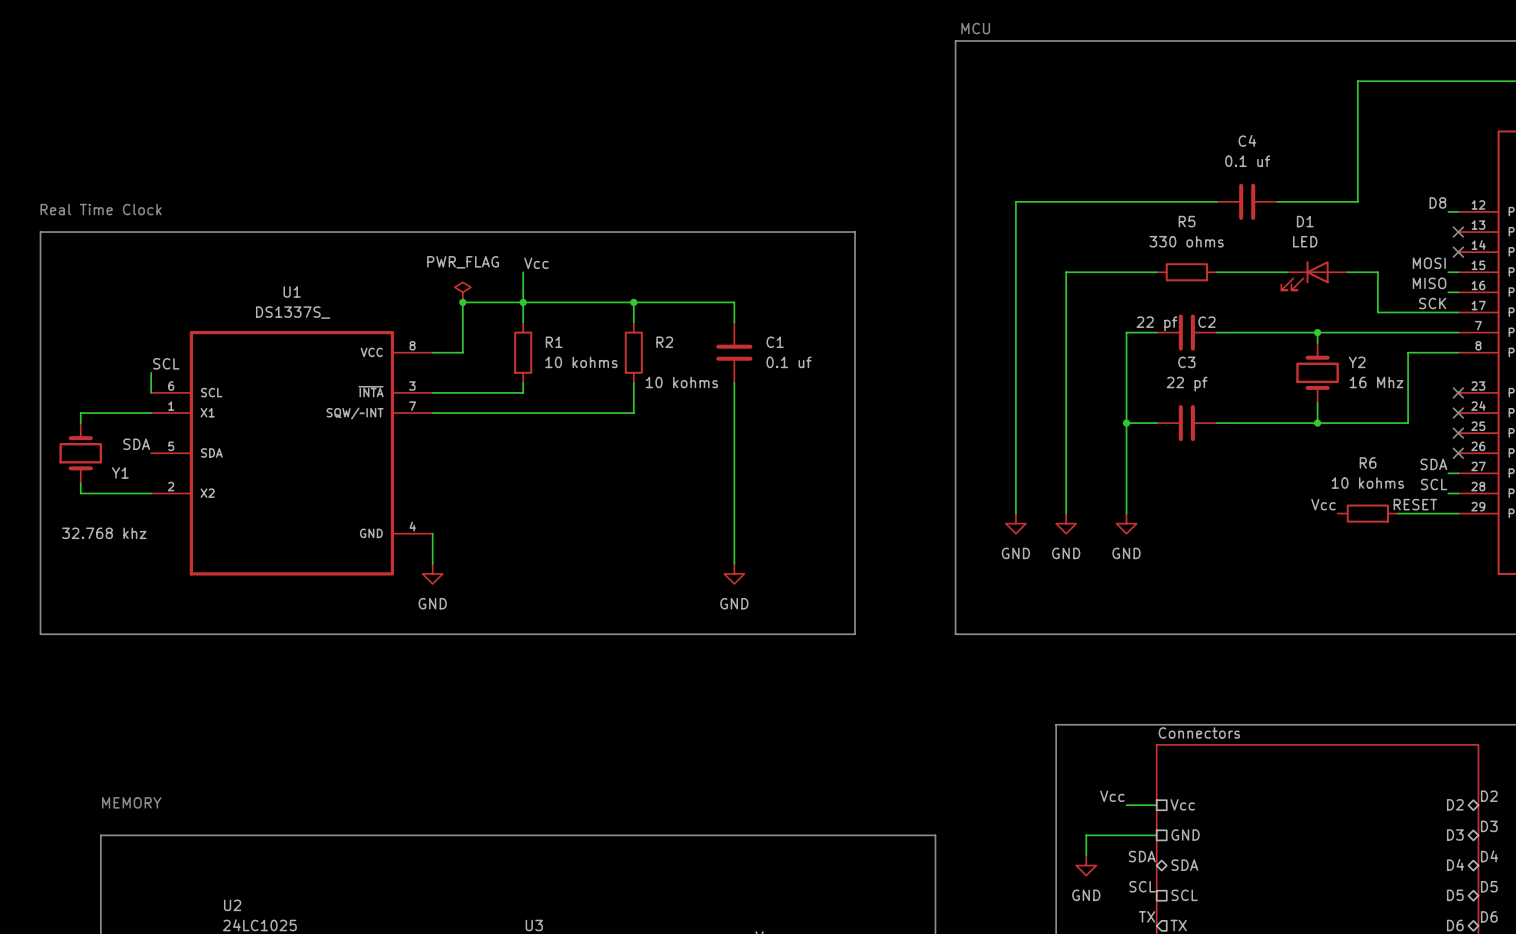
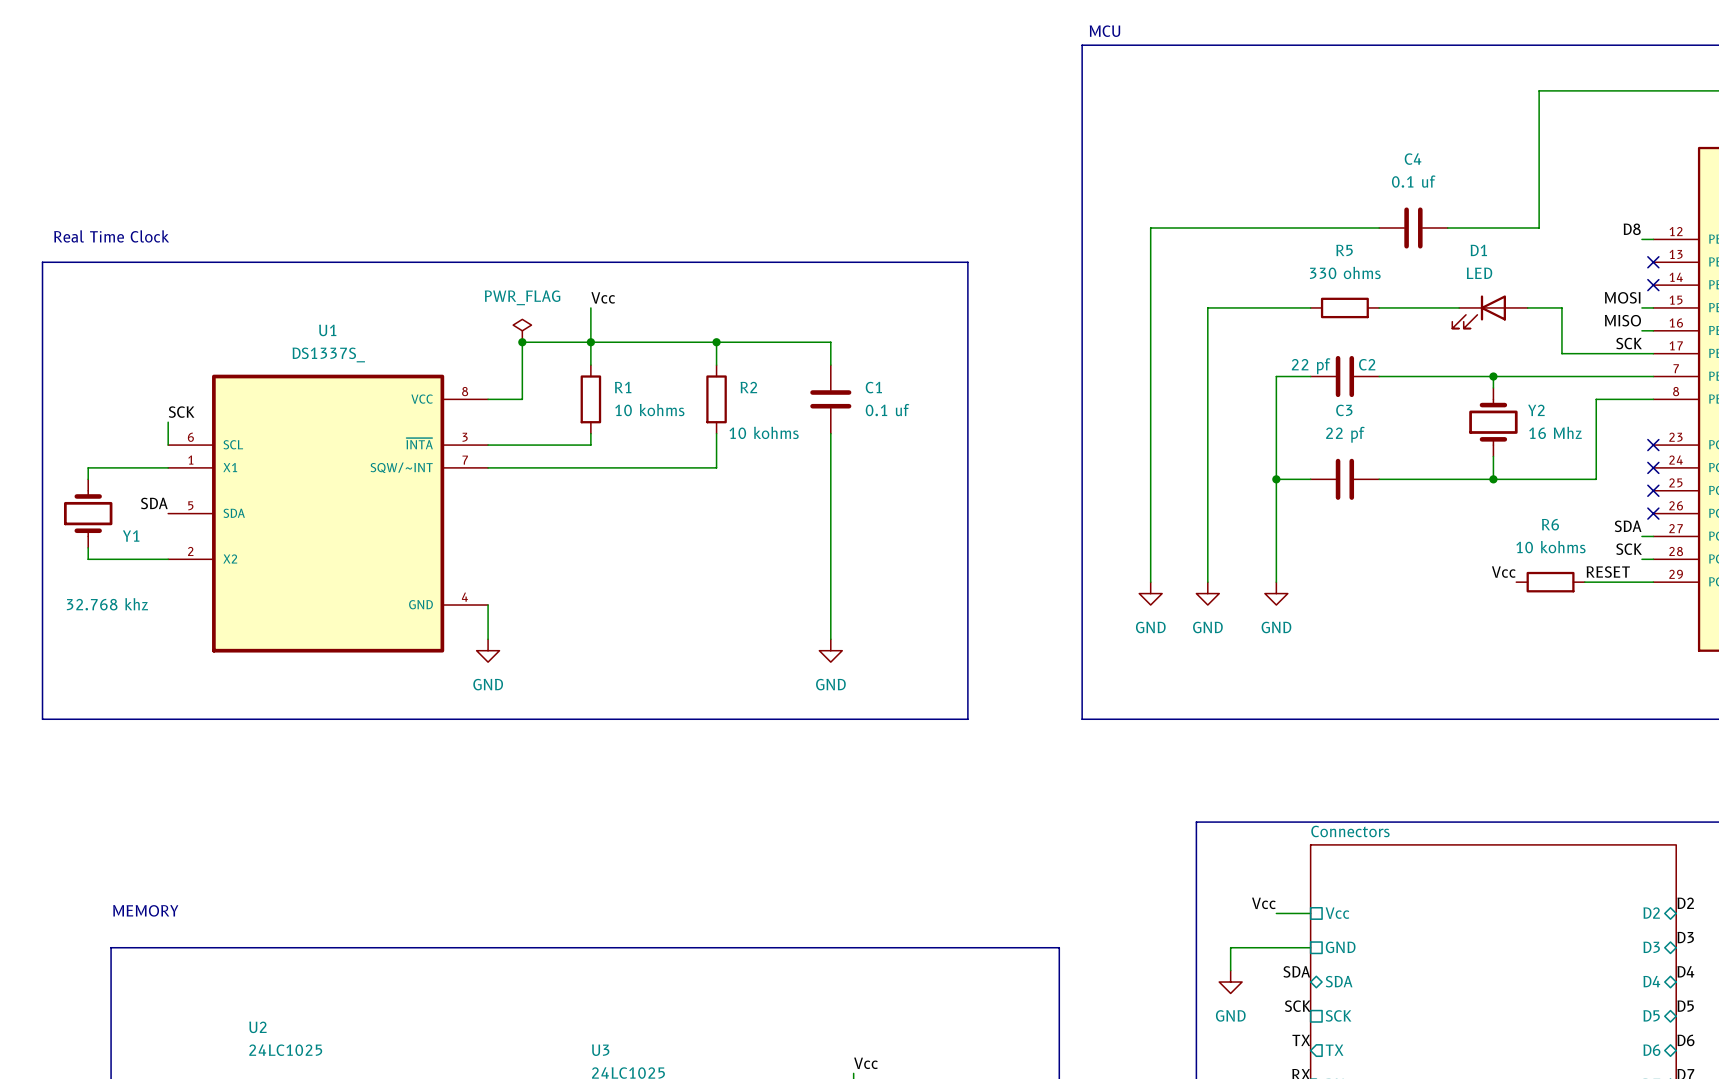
label: SCL (166, 363) -> SCK (181, 412)
label: SCL (1434, 484) -> SCK (1629, 549)
label: SCL (1142, 886) -> SCK (1297, 1006)
sheet pin: SCL (1184, 895) -> SCK (1338, 1015)

